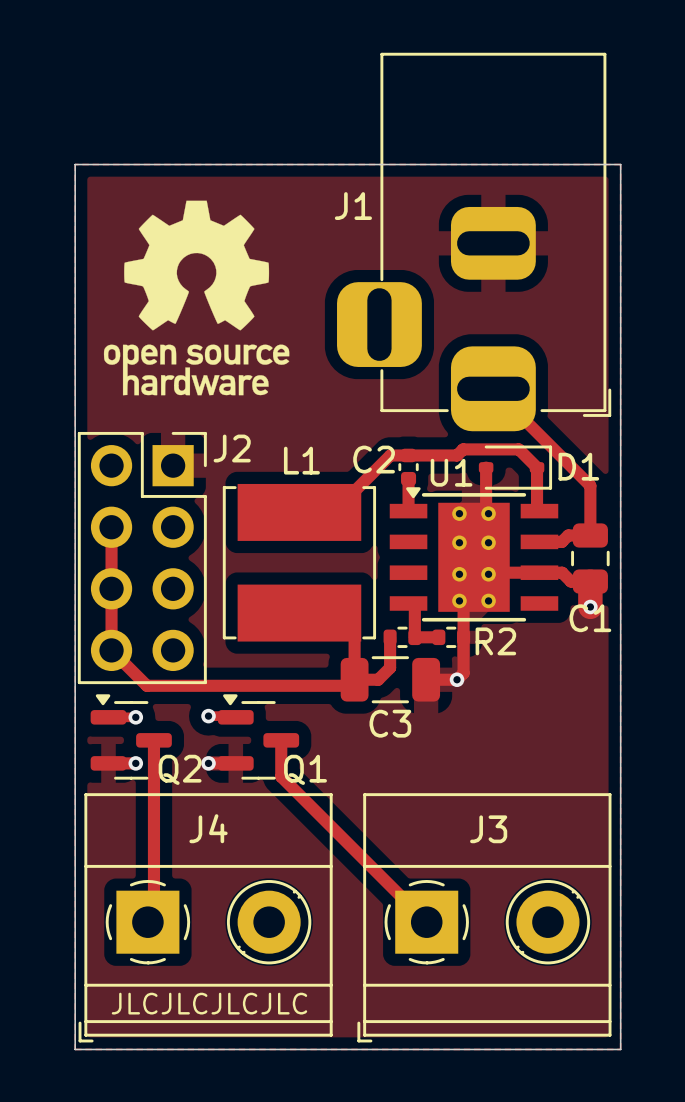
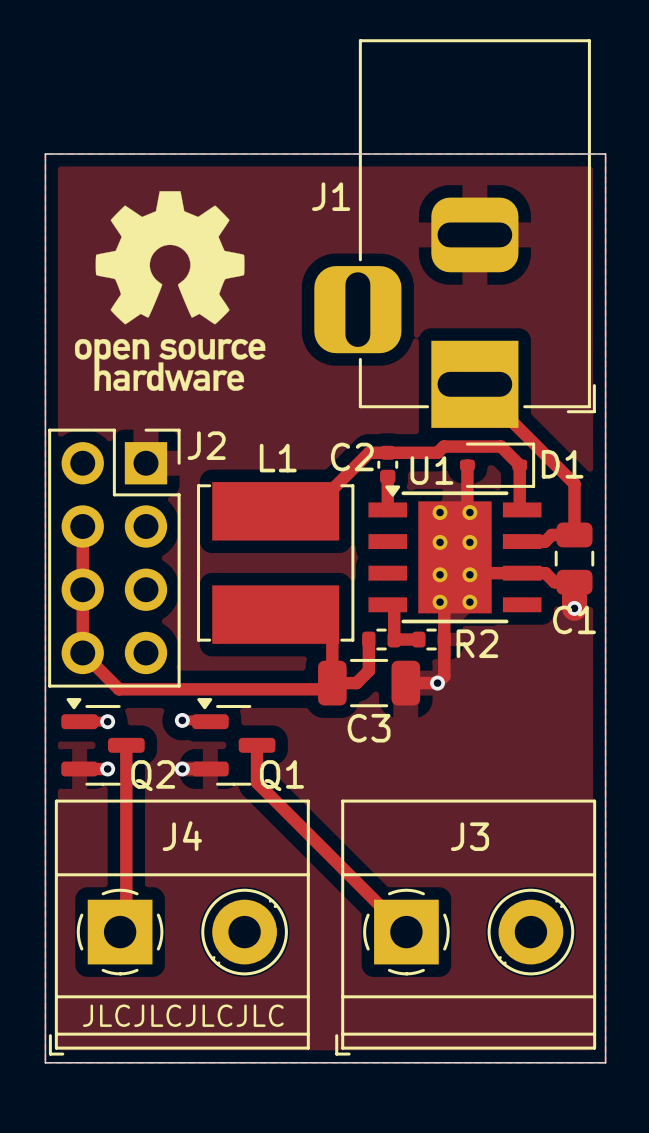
J1 footprint: [337, 52, 612, 432] -> [314, 39, 596, 428]

